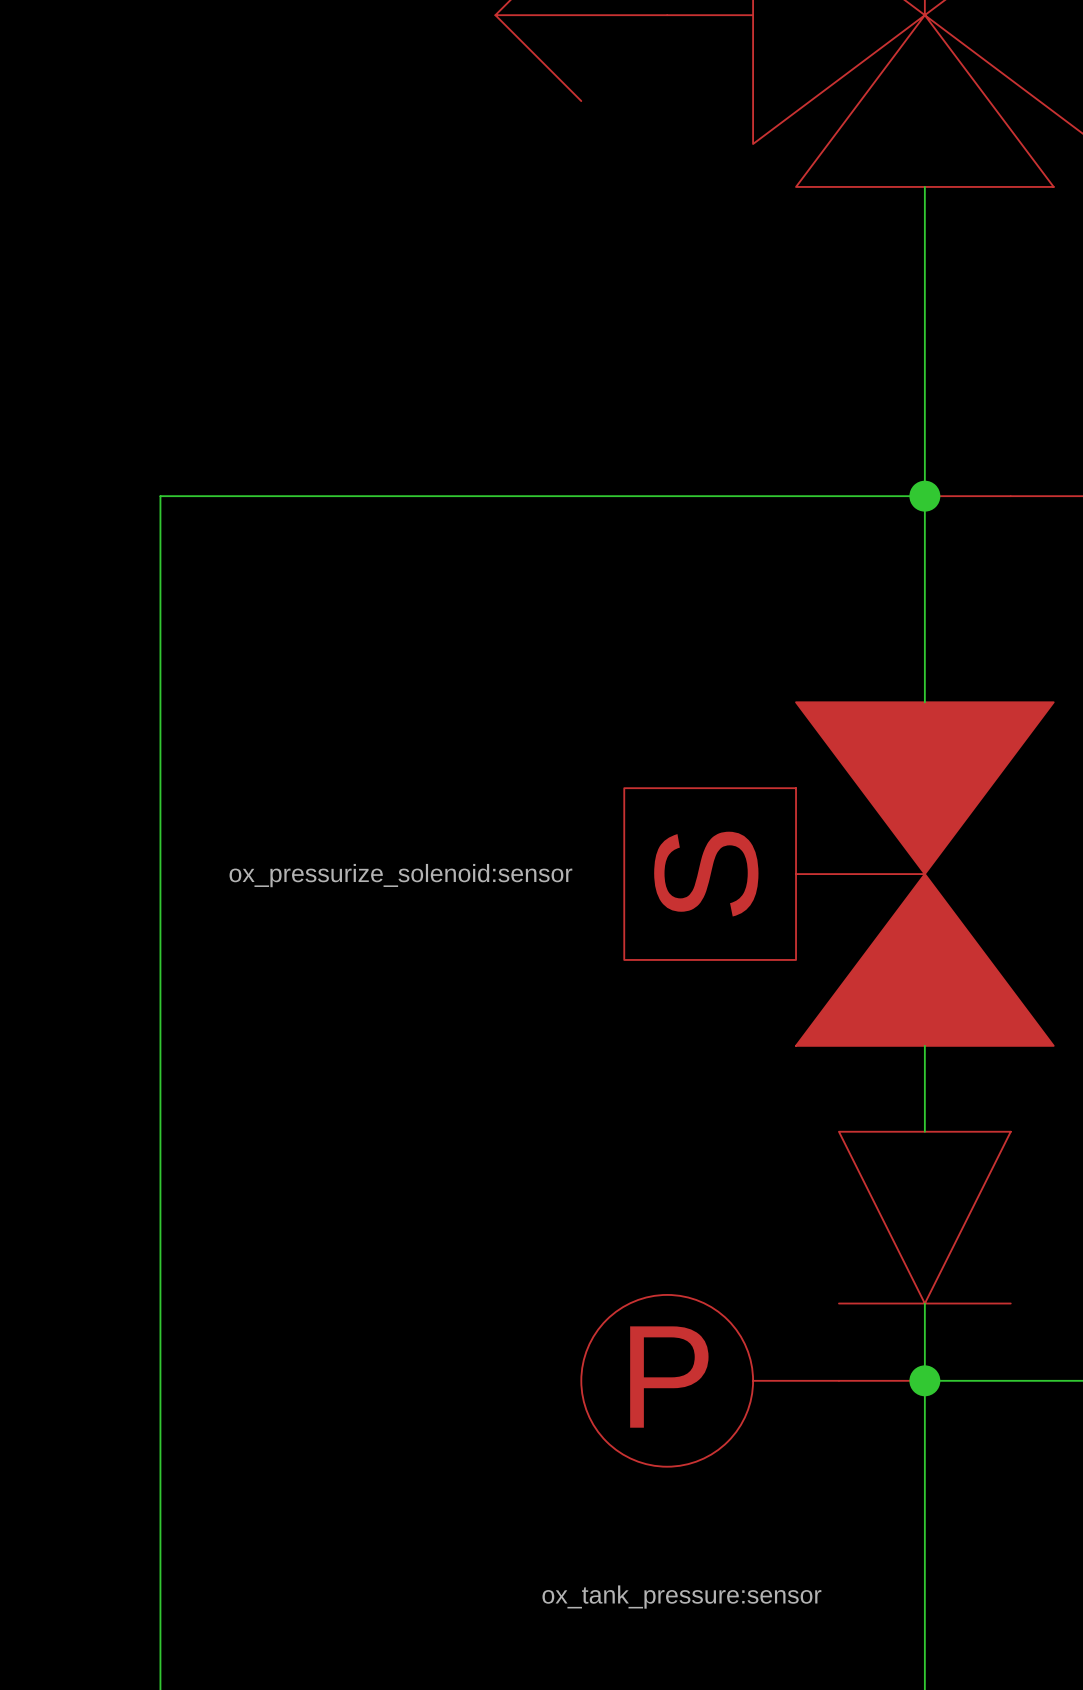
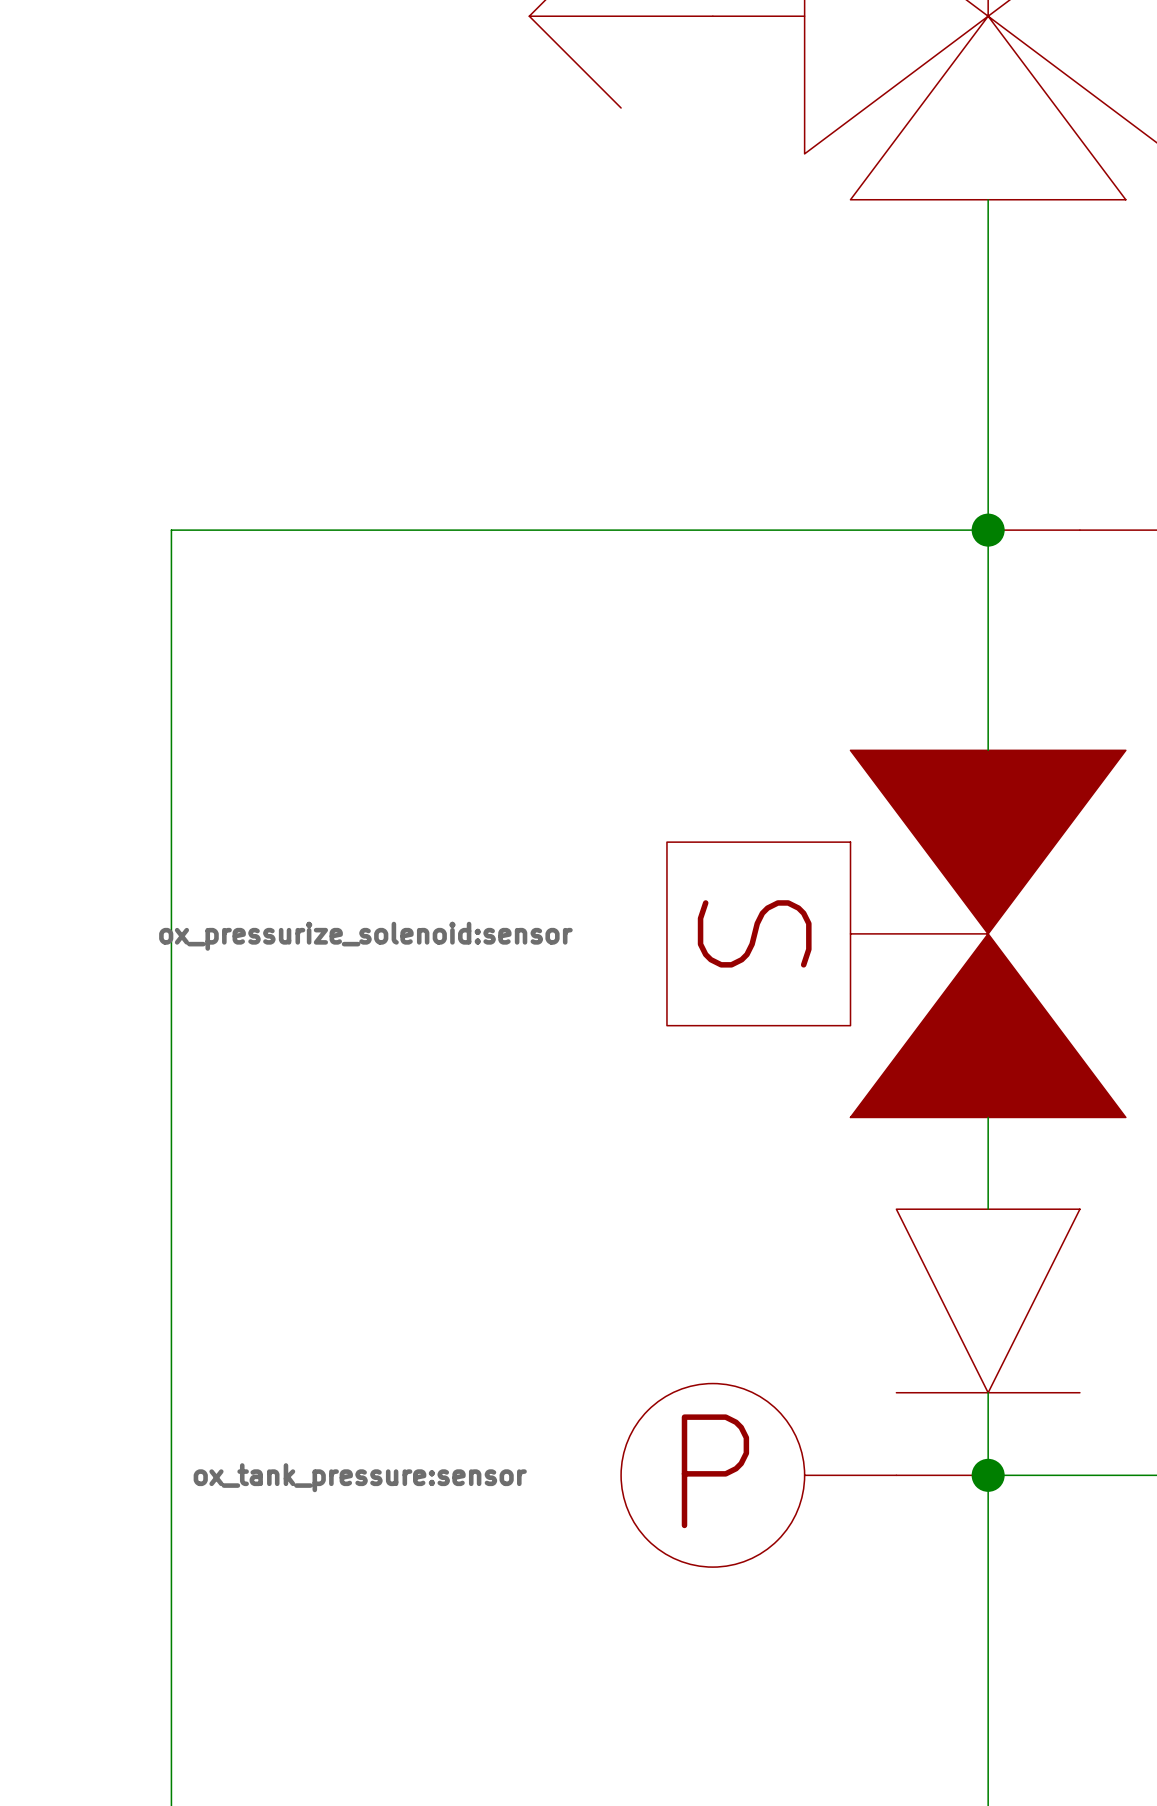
part value position: ox_pressurize_solenoid:sensor (400, 875) -> ox_pressurize_solenoid:sensor (365, 936)
part value position: ox_tank_pressure:sensor (681, 1597) -> ox_tank_pressure:sensor (360, 1477)

